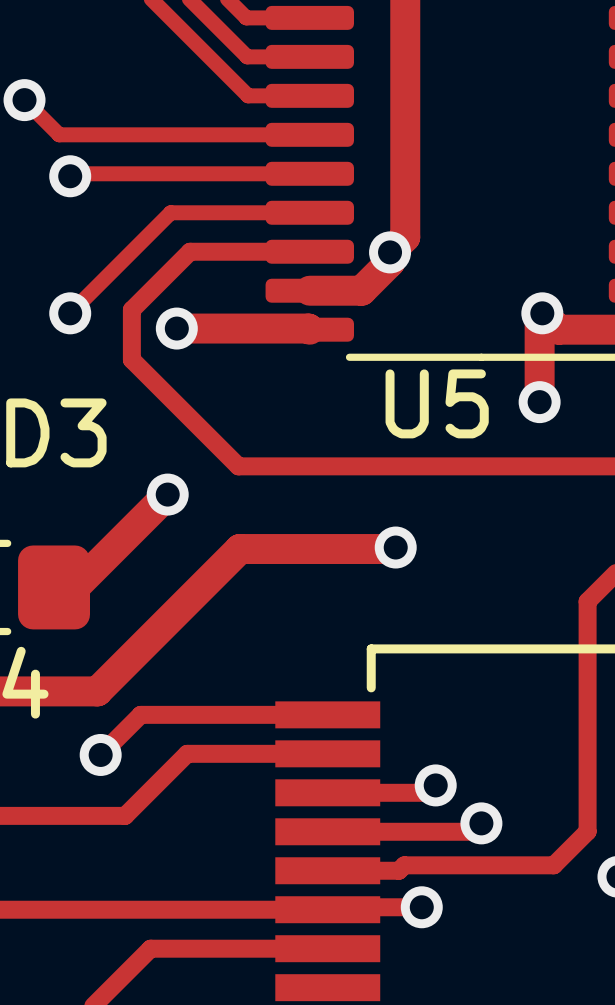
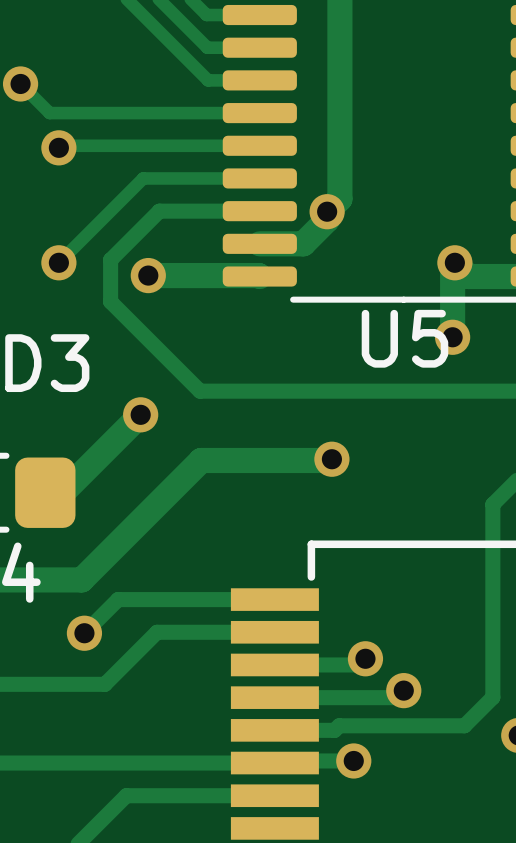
U5 name position: U5 (437, 403) -> U5 (404, 338)

